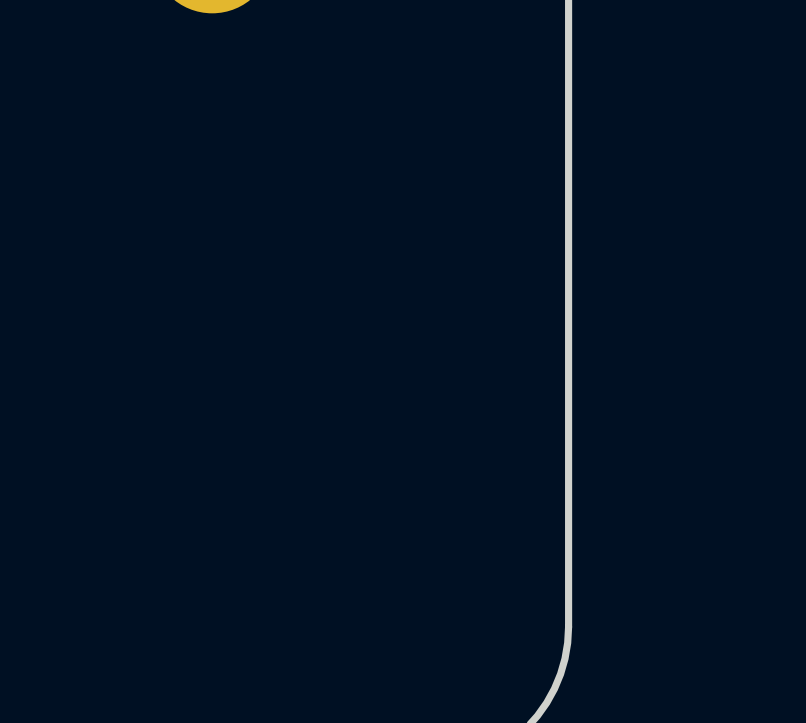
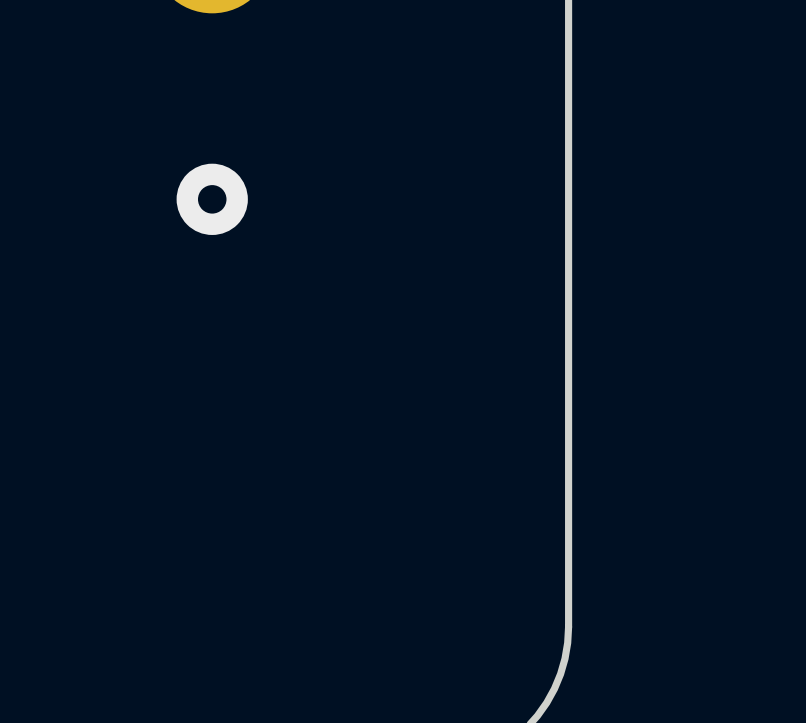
via: none -> (212, 199)

